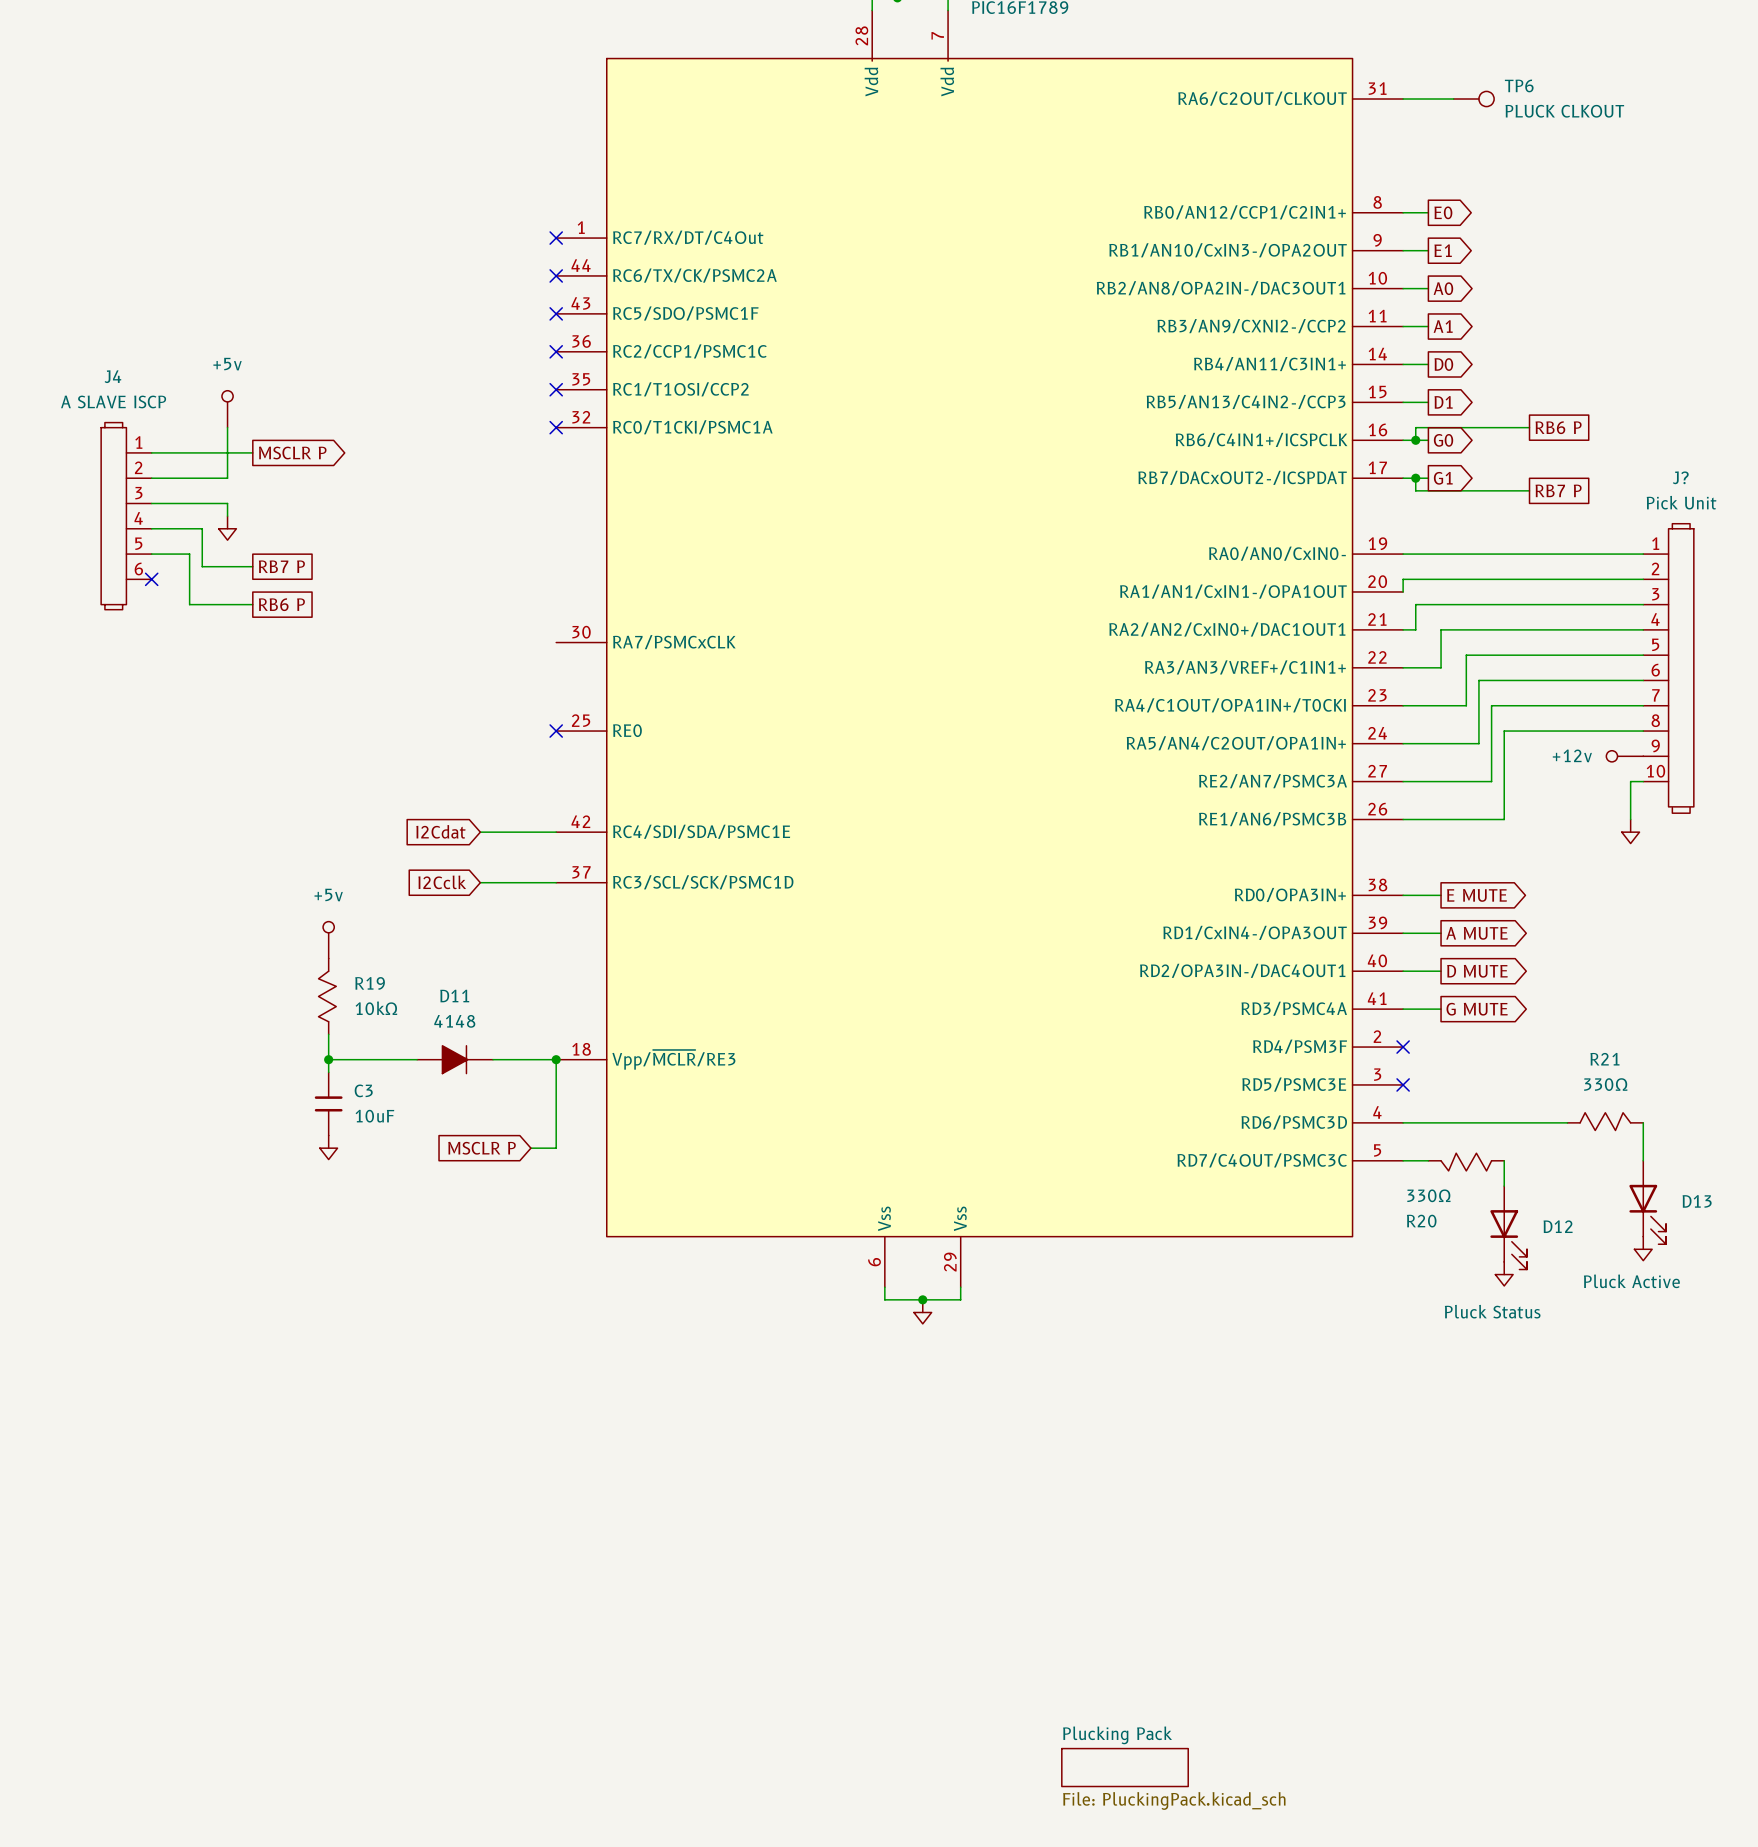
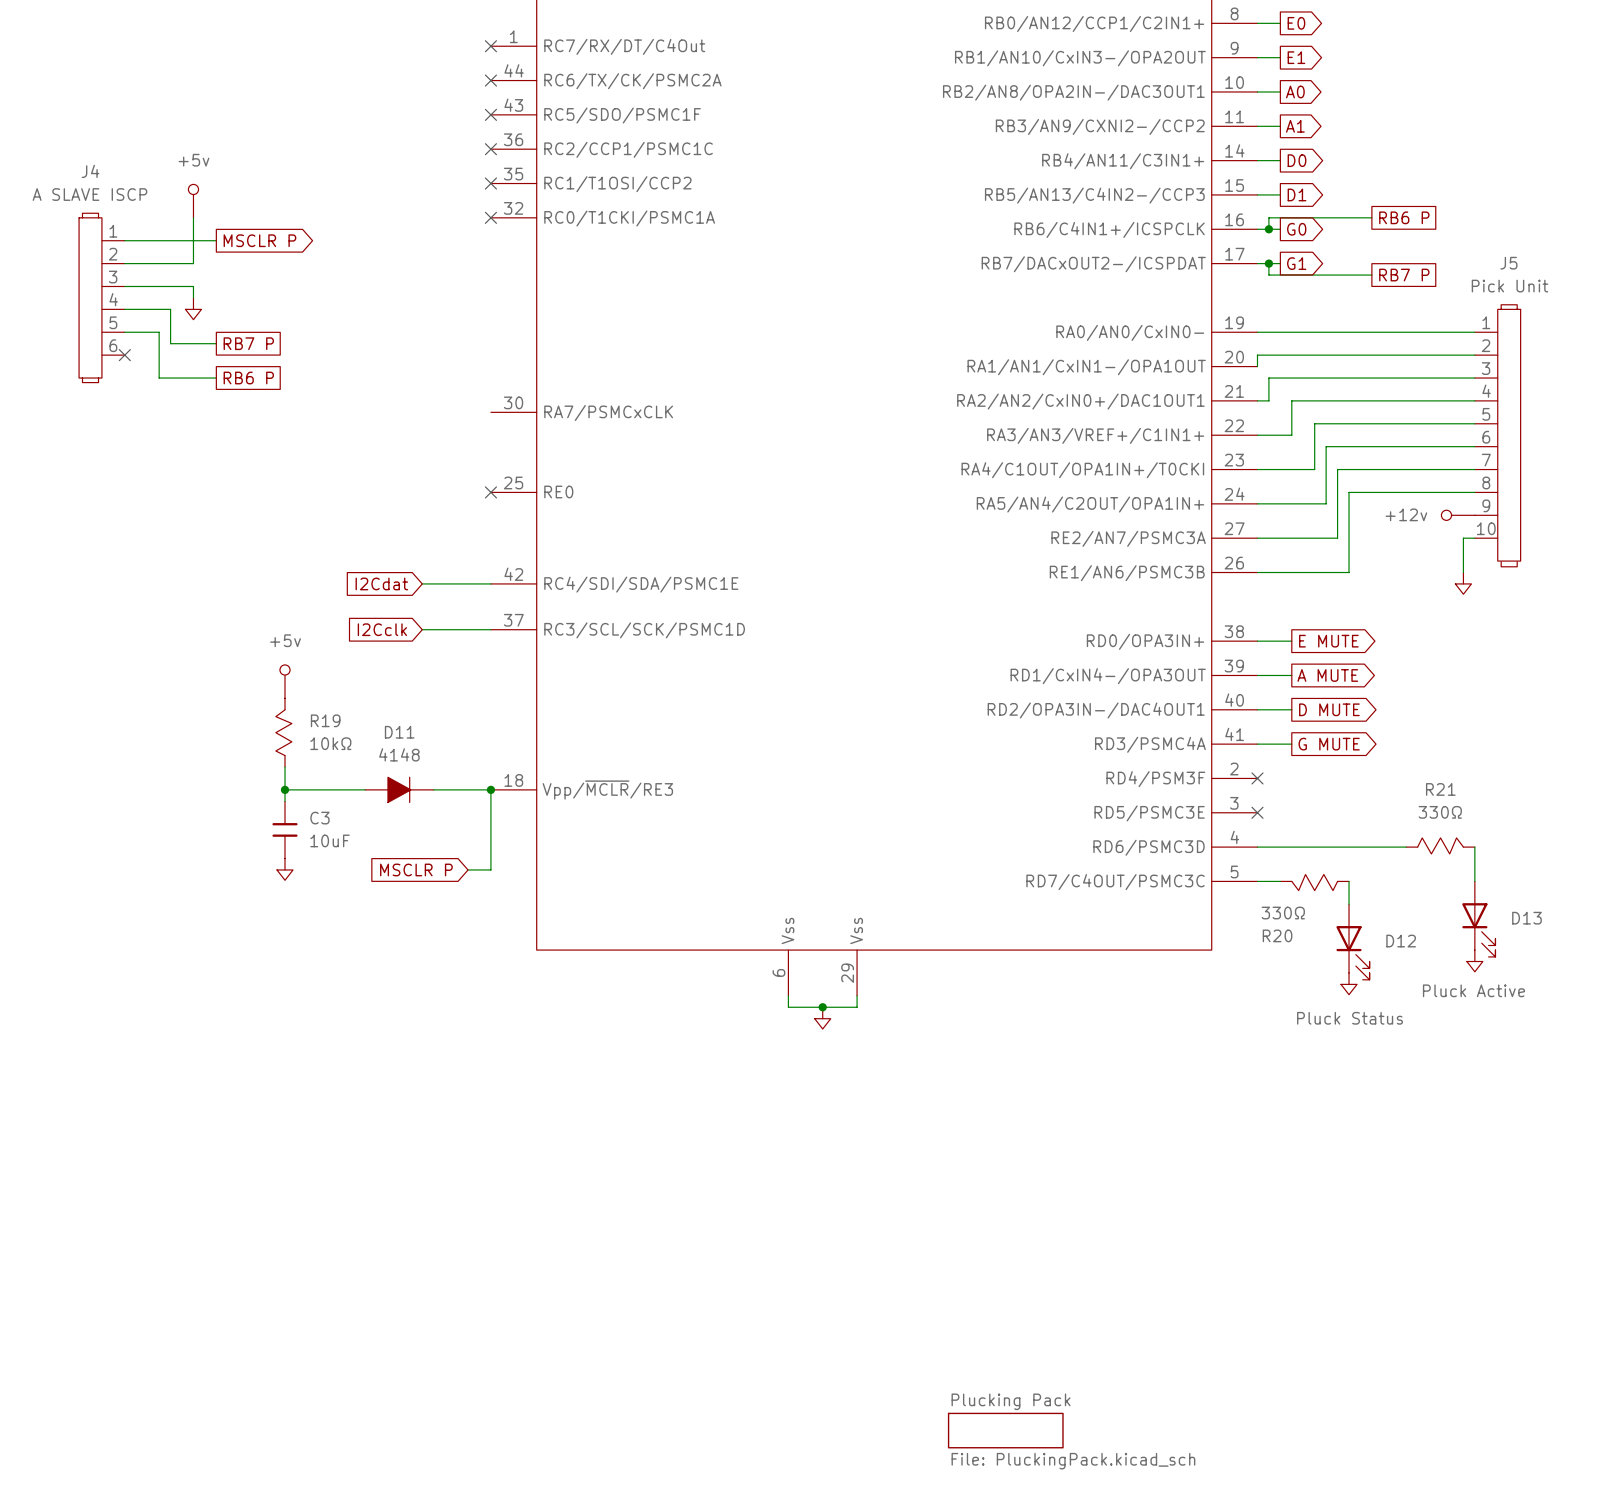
J? name: J? (1680, 477) -> J5 (1508, 263)

